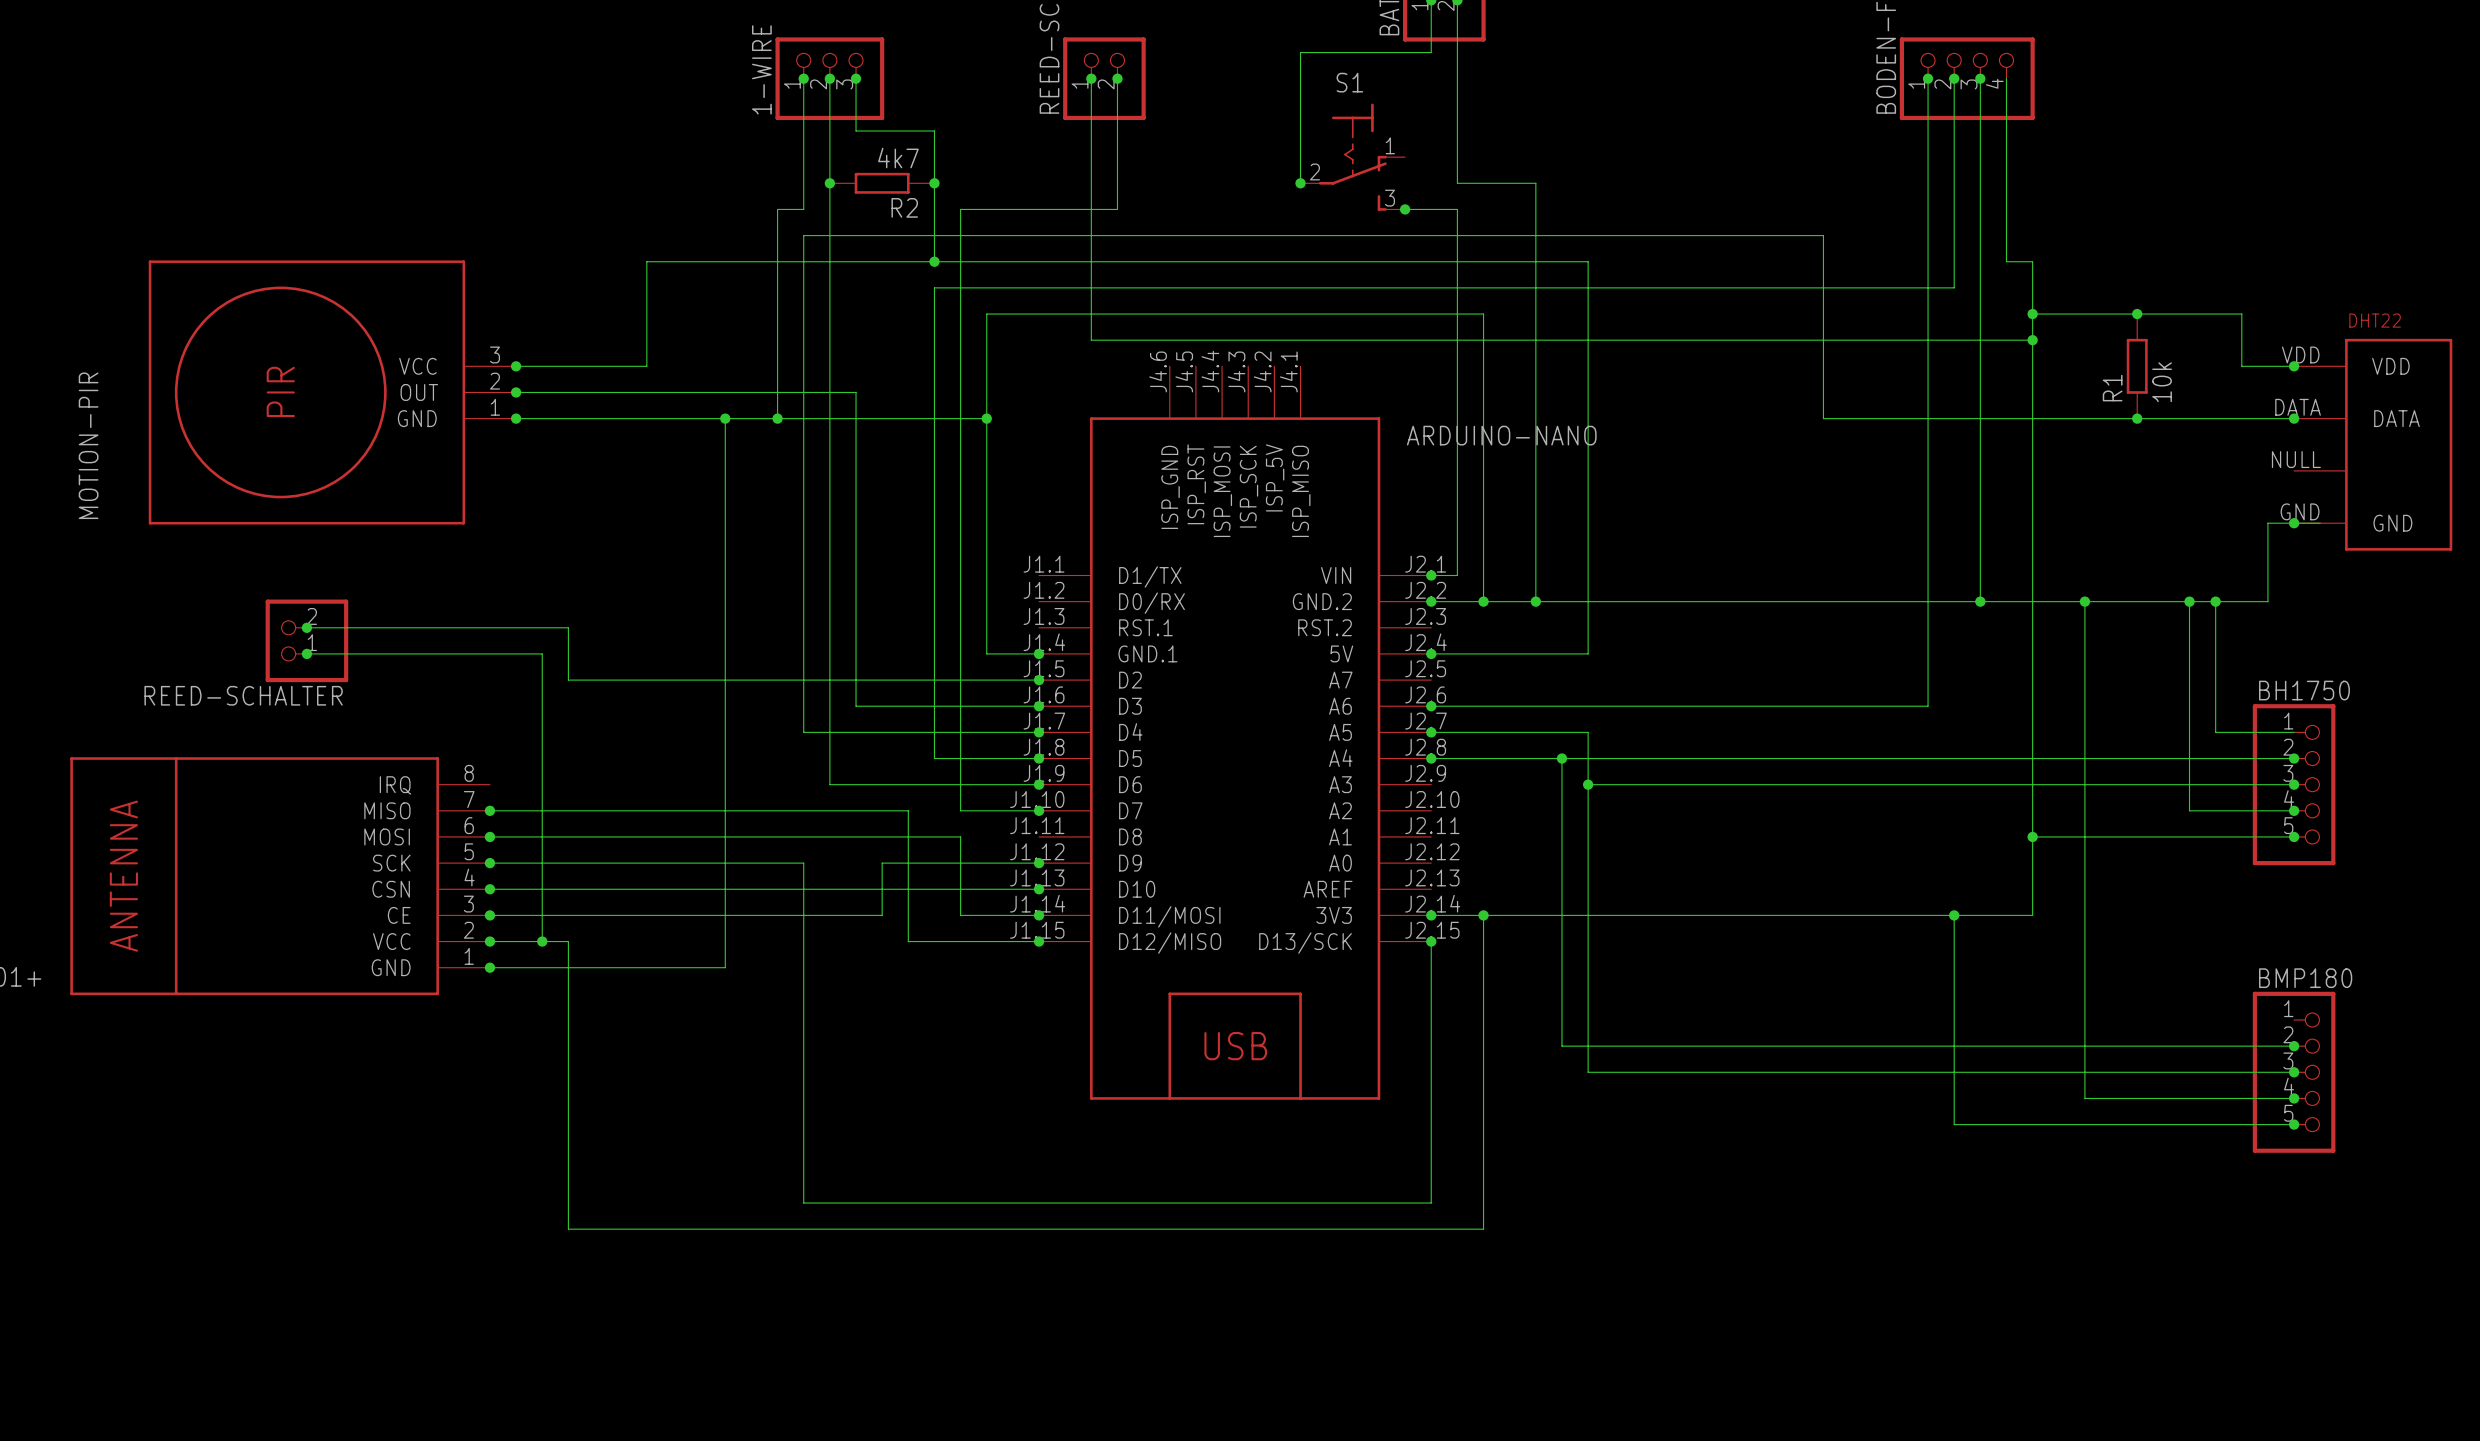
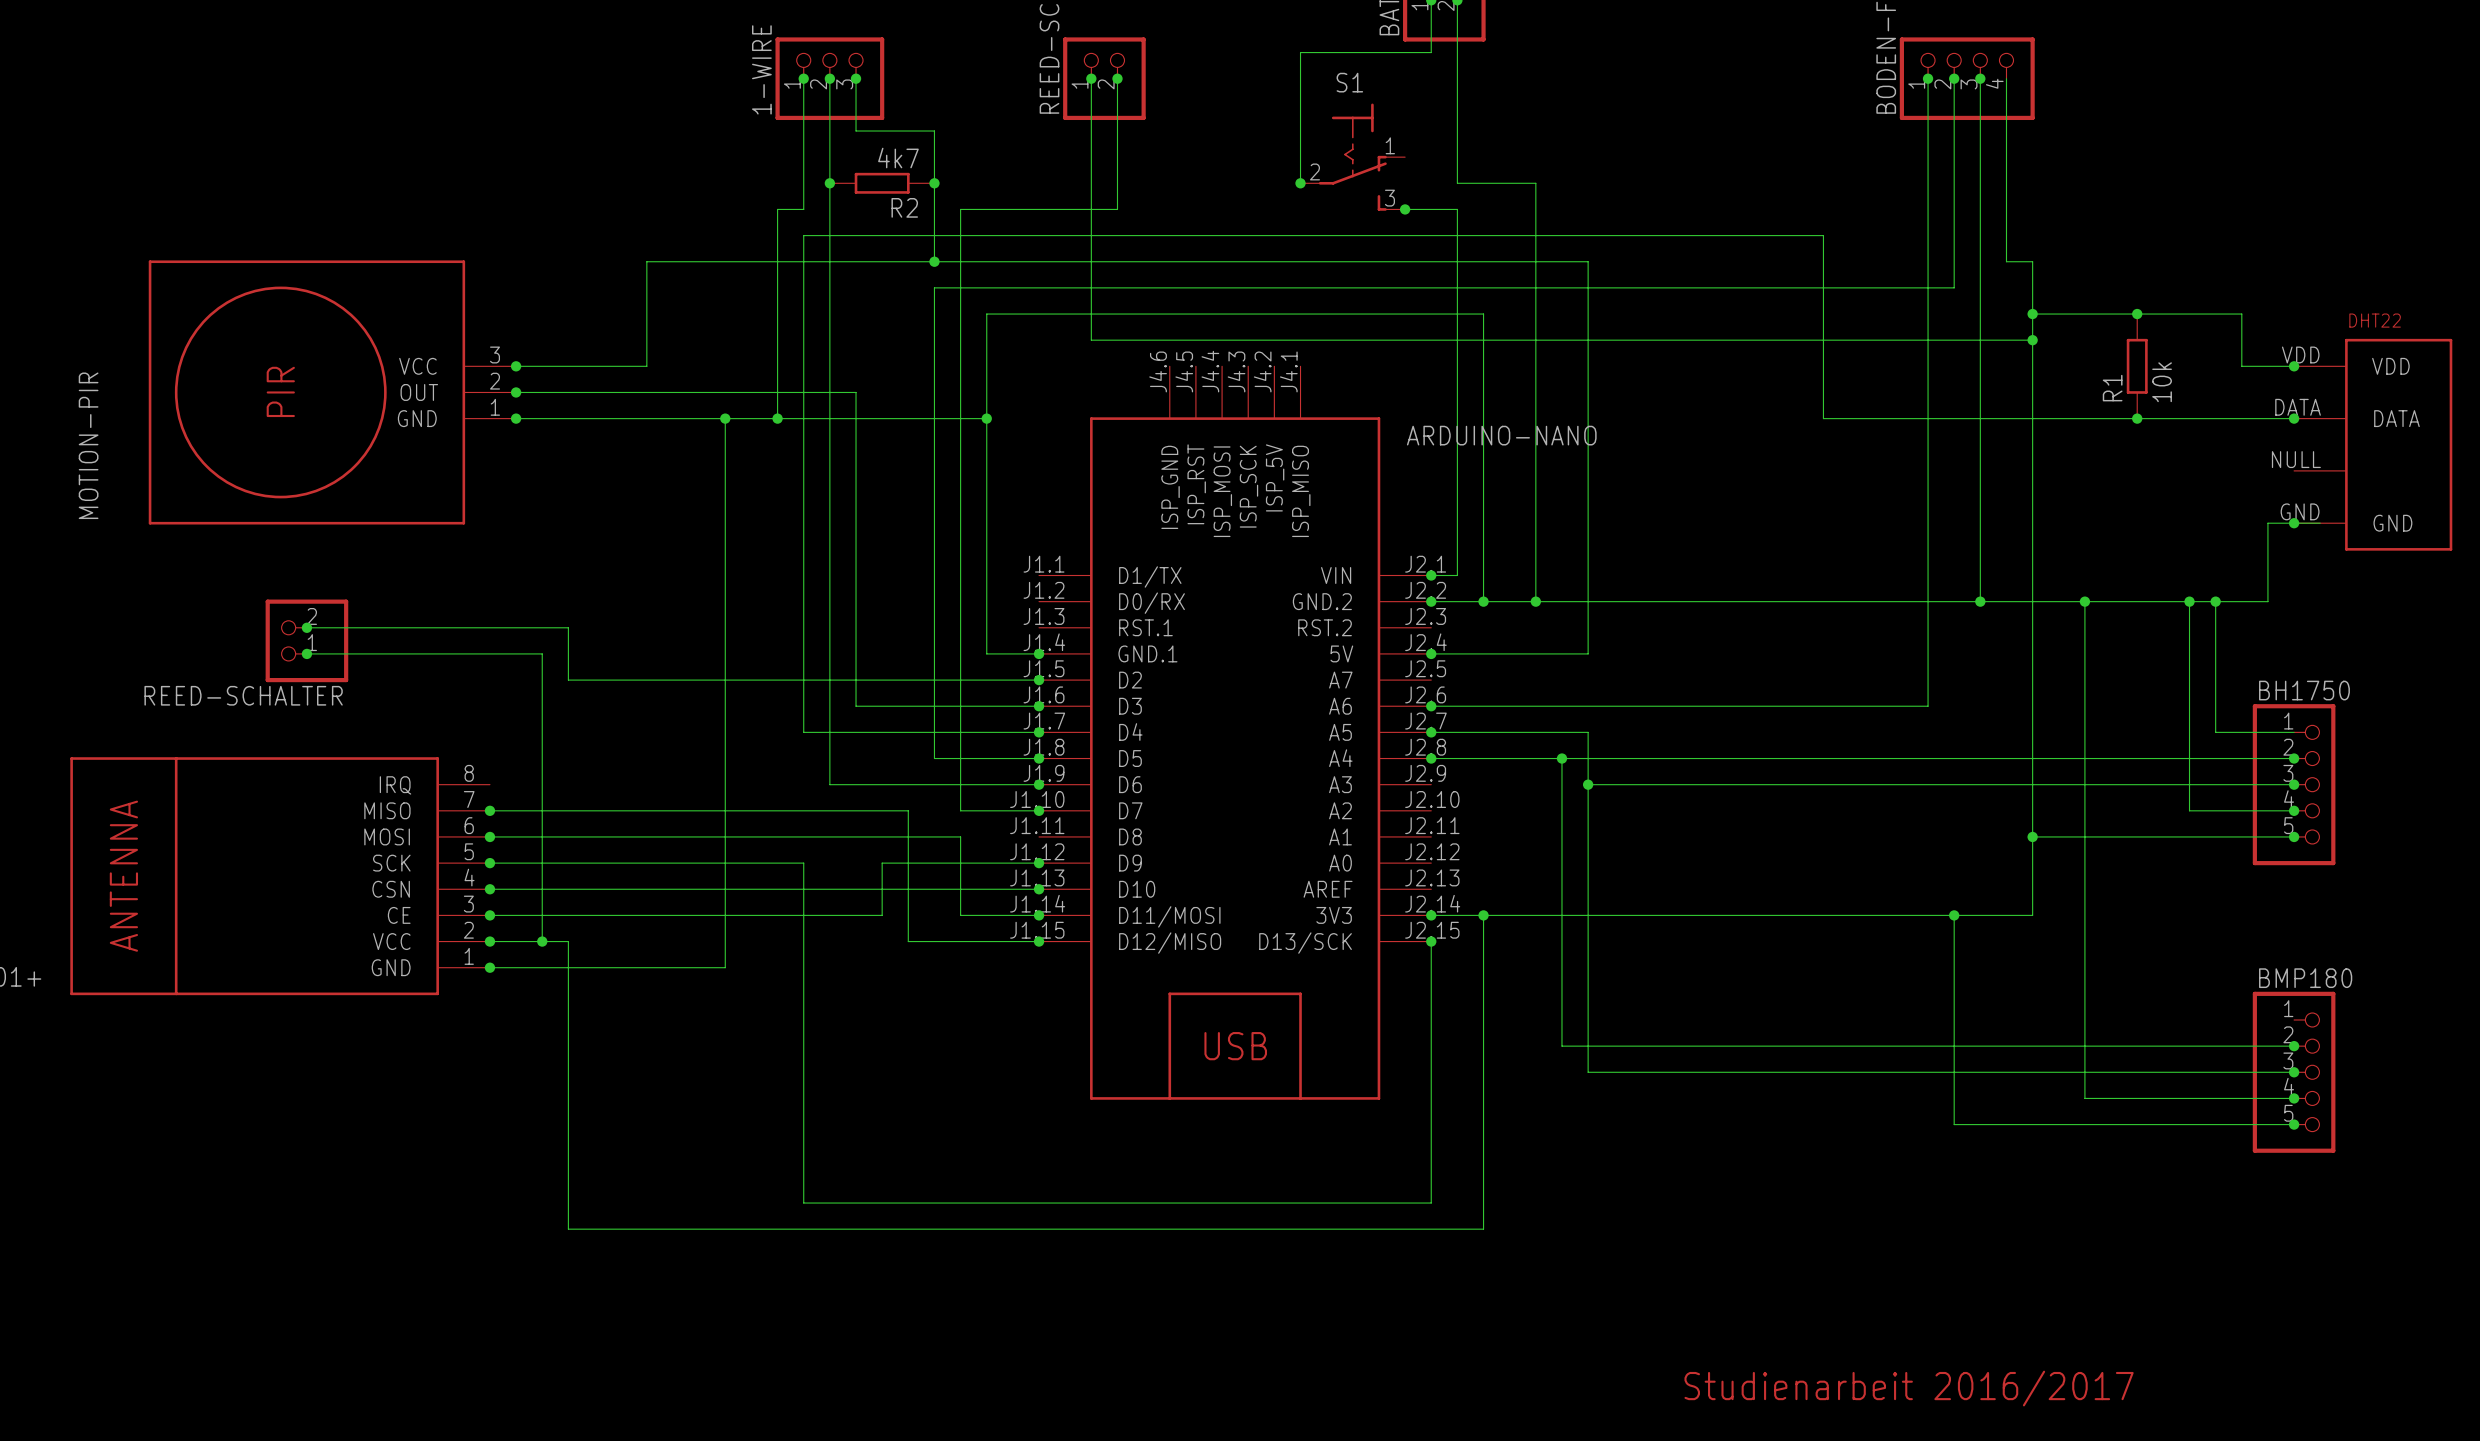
text: none -> Studienarbeit 2016/2017 (1909, 1388)

